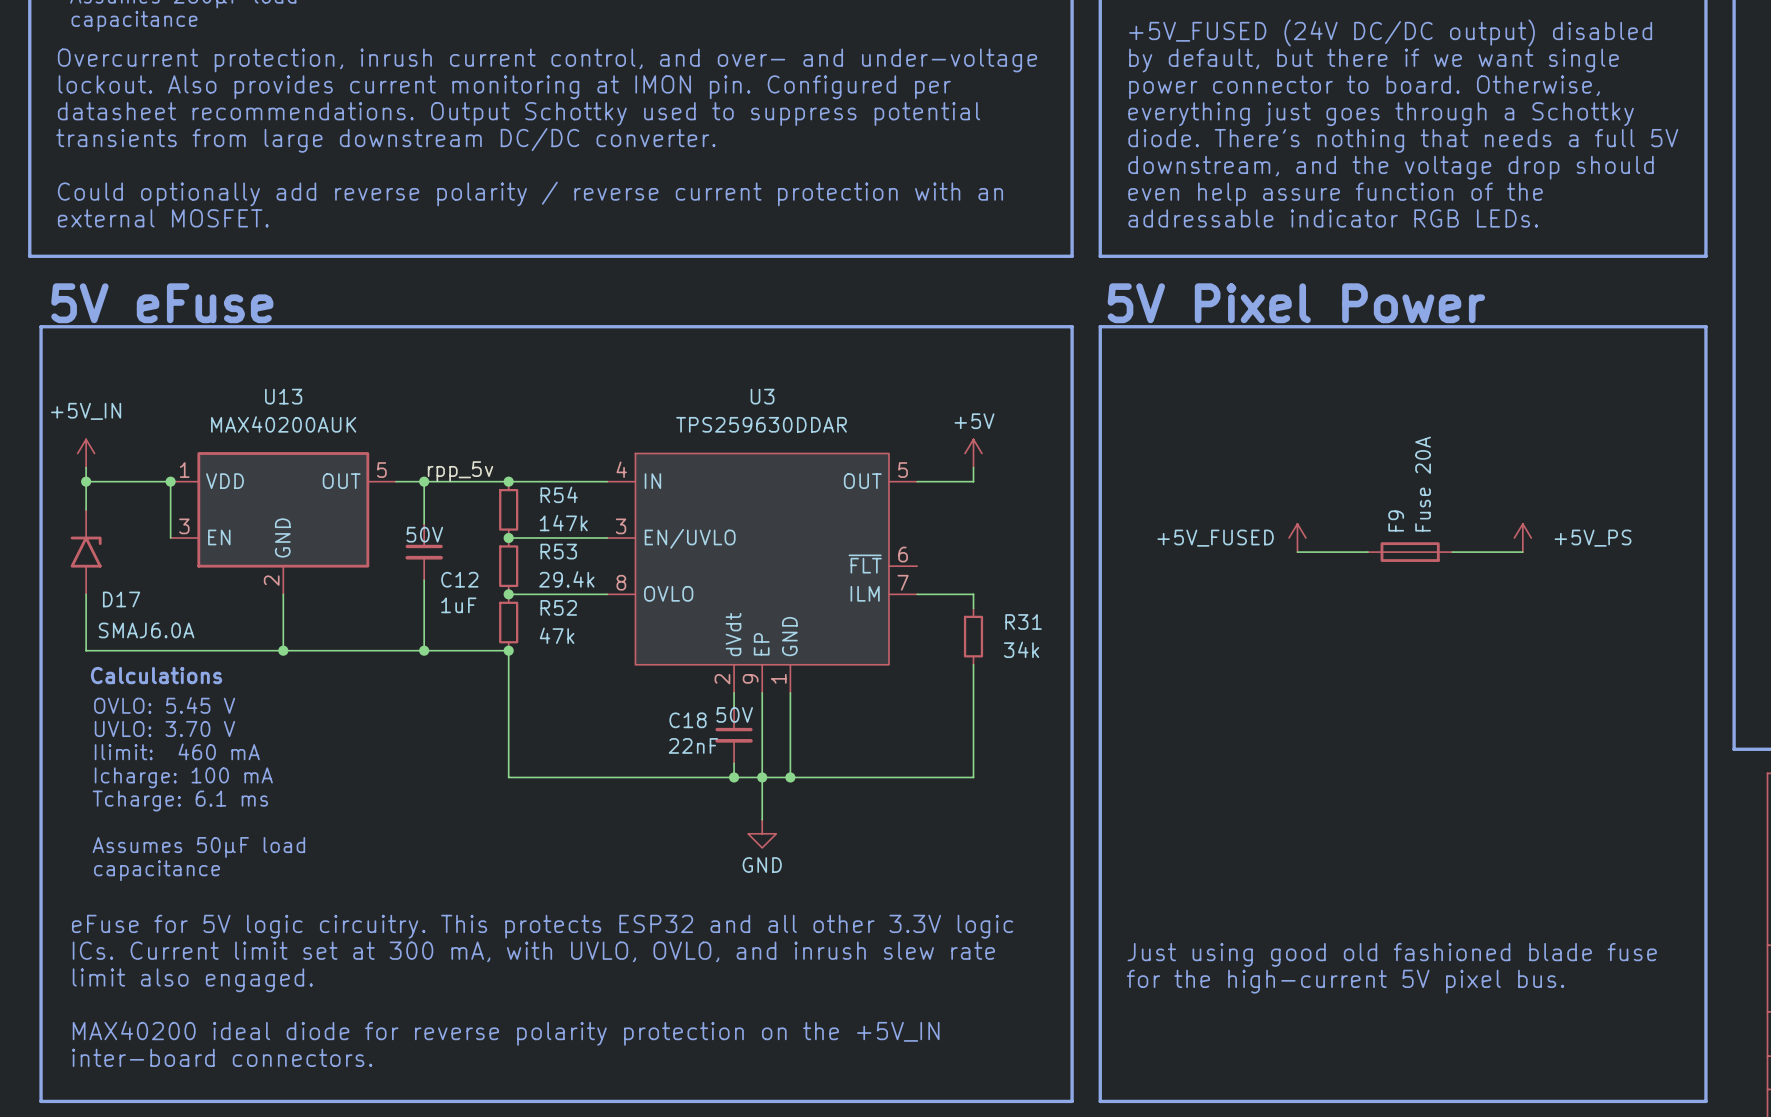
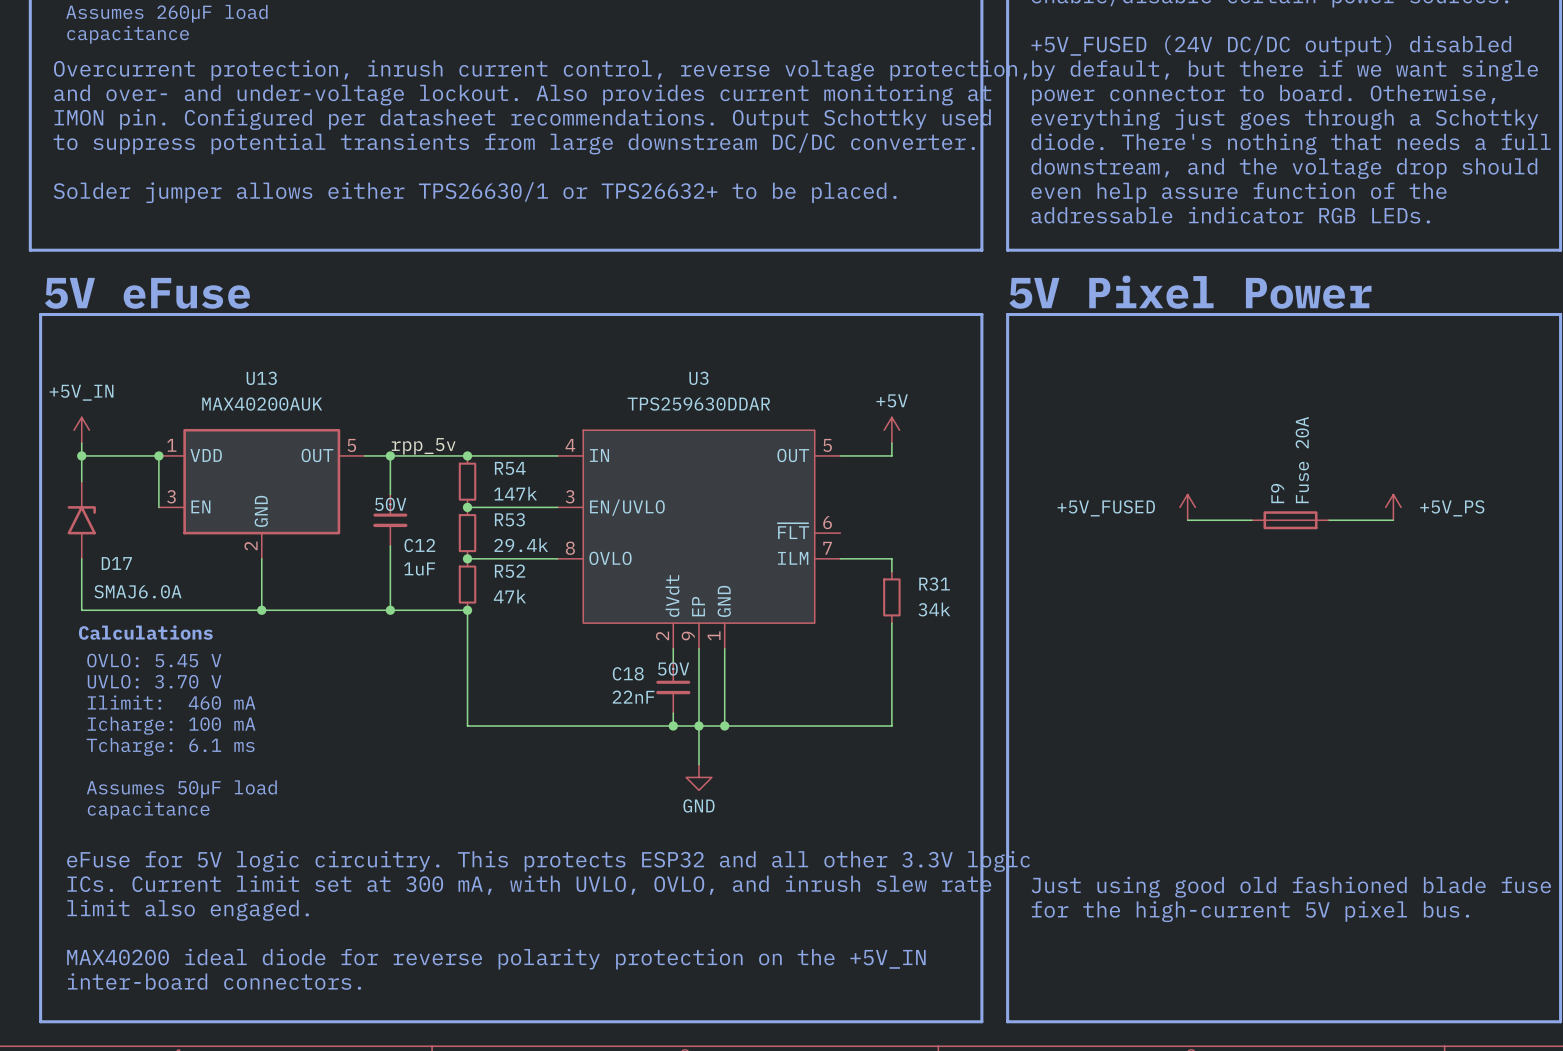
text: Overcurrent protection, inrush current control, and over- and under-voltage (547, 60) -> Overcurrent protection, inrush current control, reverse voltage protection, (540, 70)
text: lockout. Also provides current monitoring at IMON pin. Configured per (504, 87) -> and over- and under-voltage lockout. Also provides current monitoring at (522, 95)
text: datasheet recommendations. Output Schottky used to suppress potential (518, 113) -> IMON pin. Configured per datasheet recommendations. Output Schottky used (522, 119)
text: transients from large downstream DC/DC converter. (385, 140) -> to suppress potential transients from large downstream DC/DC converter. (514, 143)
text: Could optionally add reverse polarity / reverse current protection with an (530, 193) -> Solder jumper allows either TPS26630/1 or TPS26632+ to be placed. (475, 192)
text: external MOSFET. (163, 218) -> none

